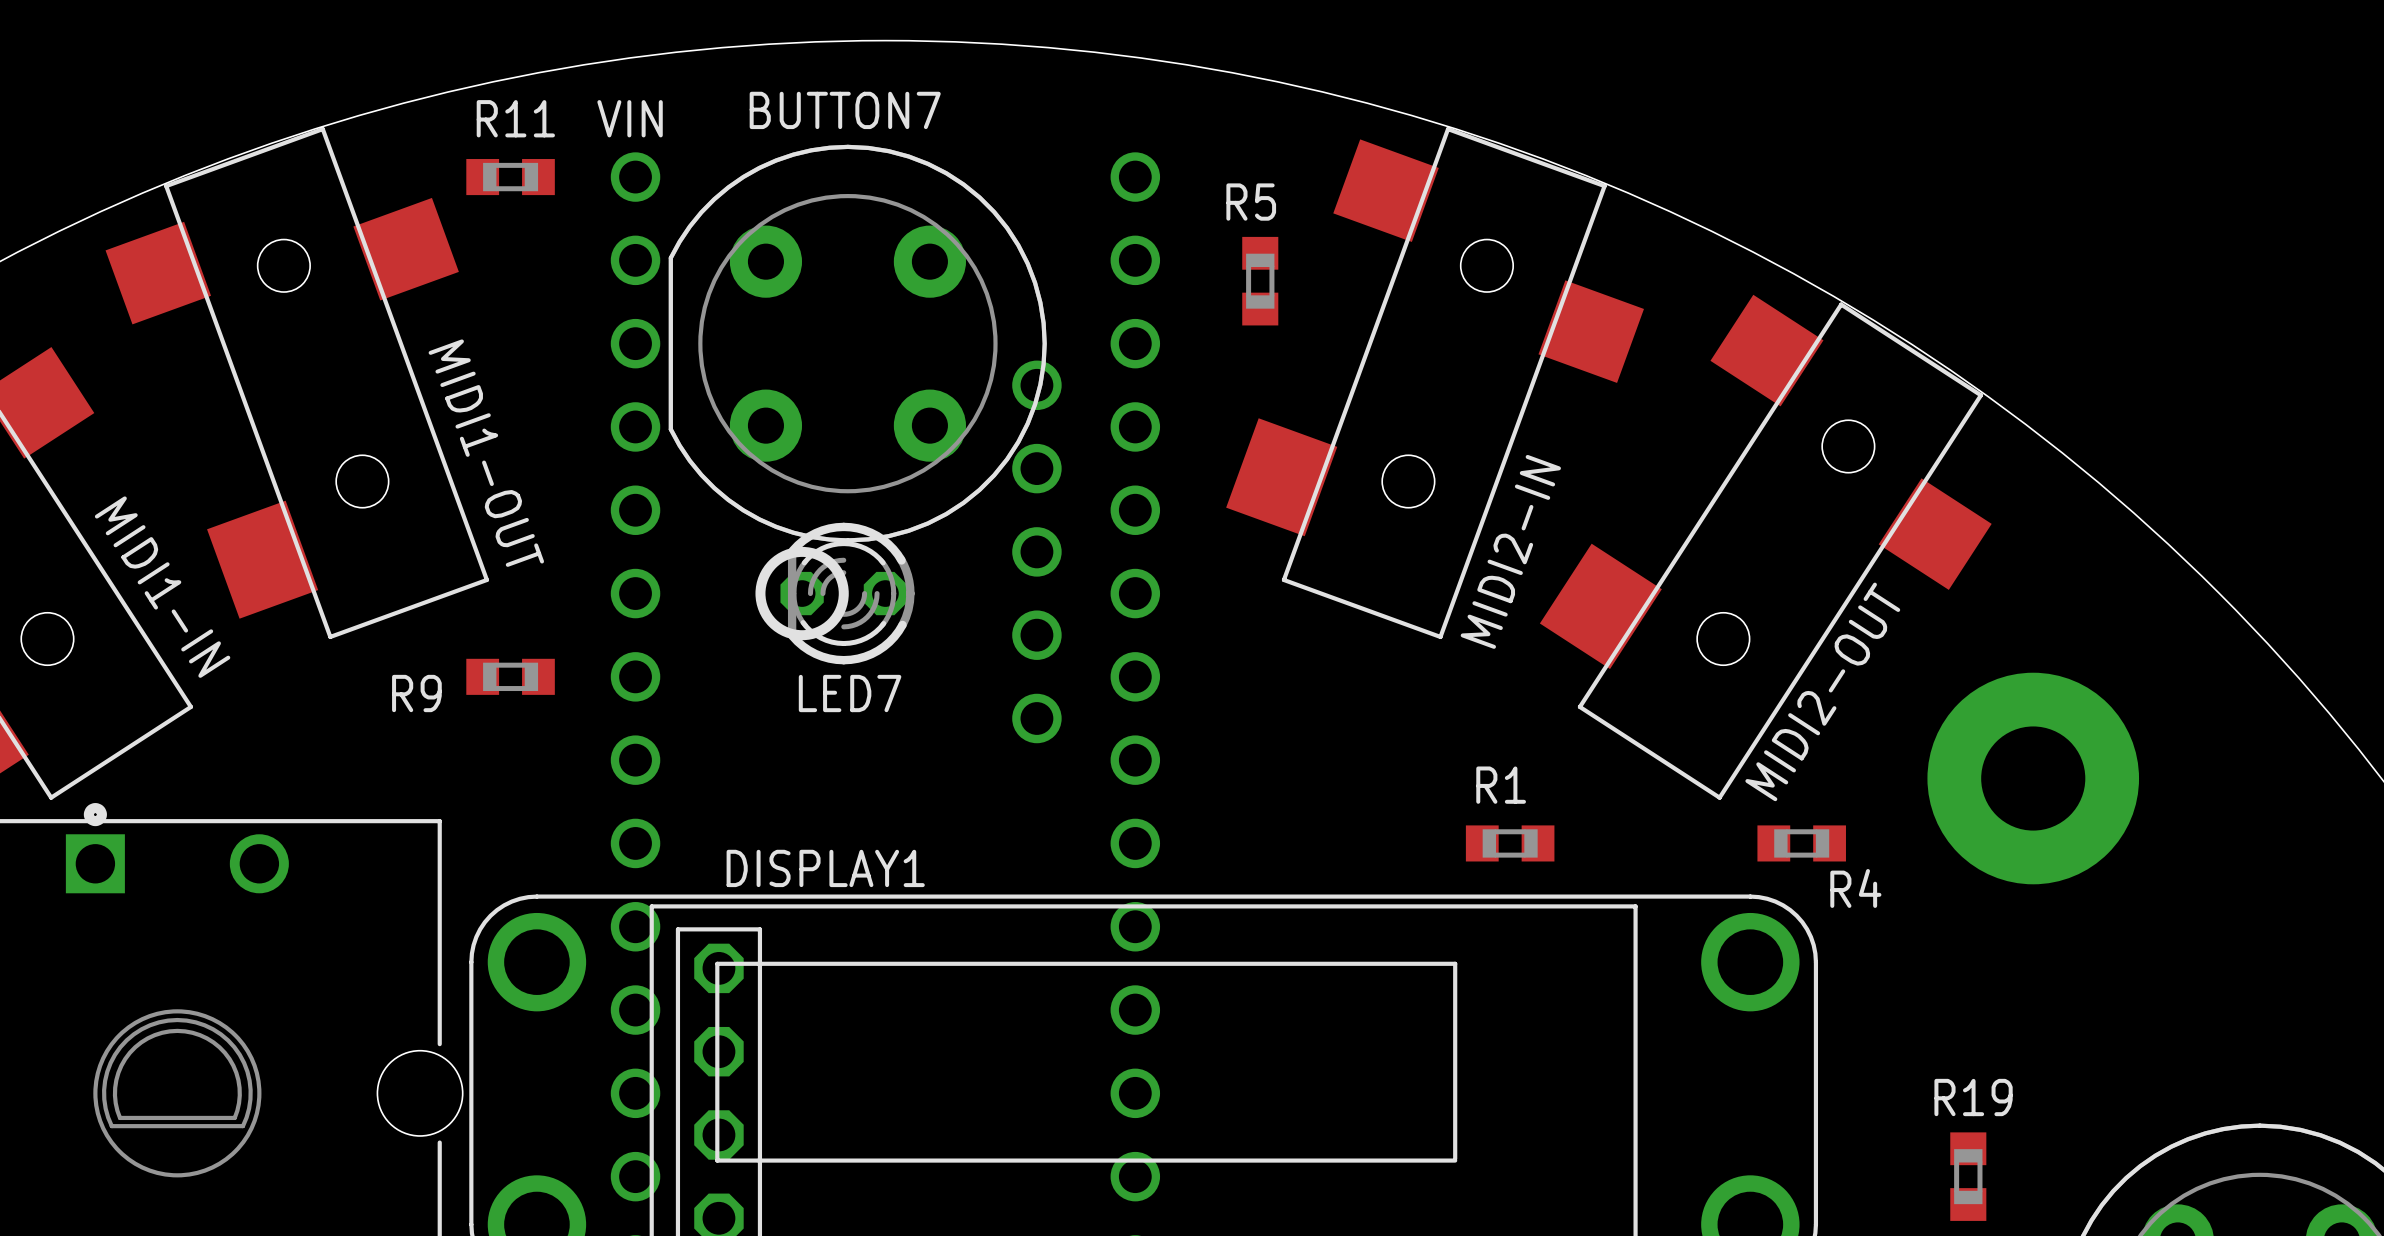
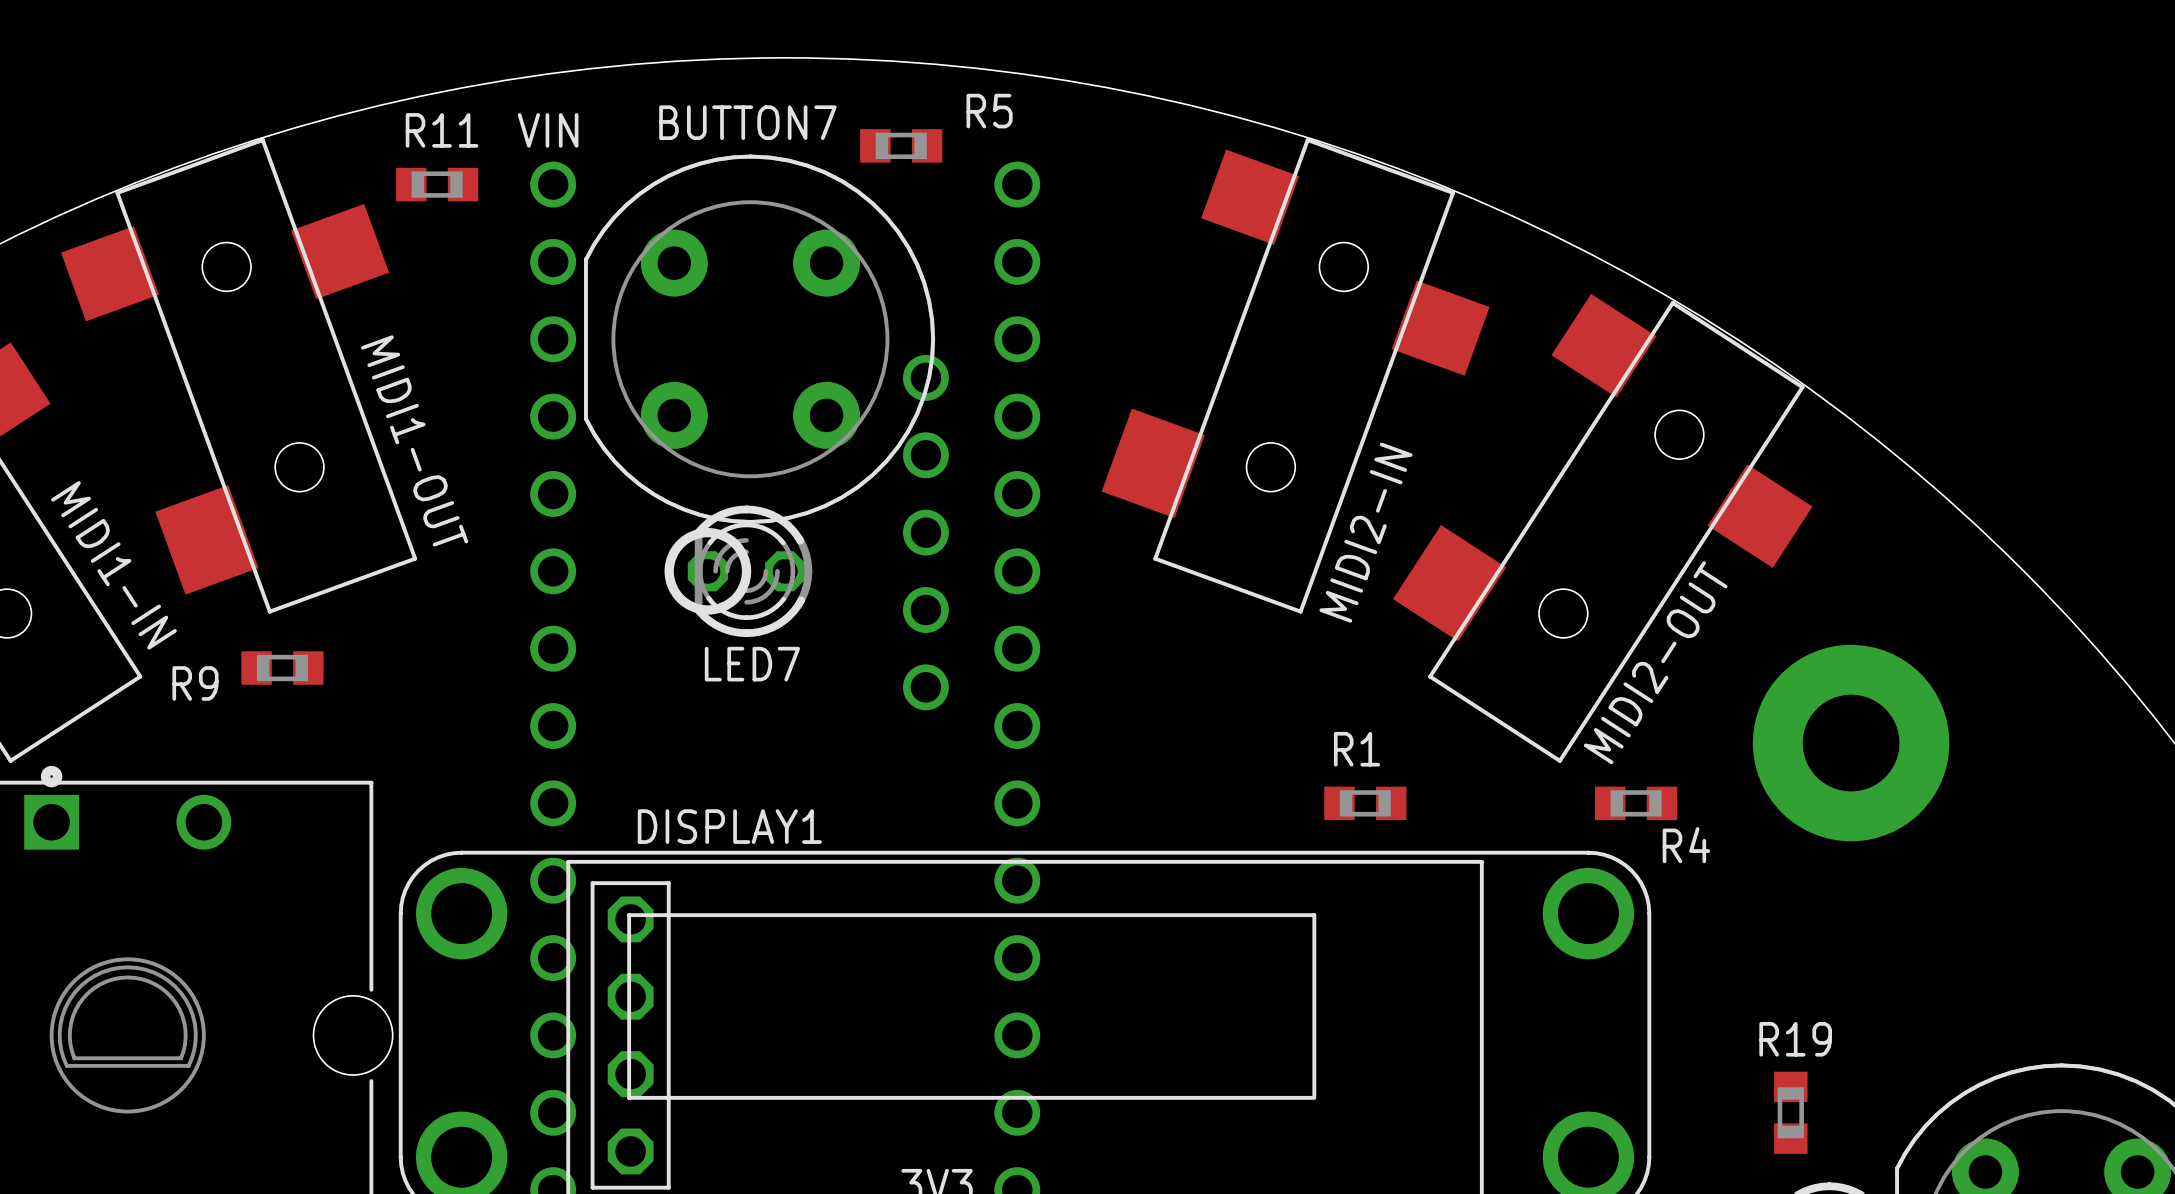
R5 rotation: 0° (1260, 281) -> 90° clockwise (901, 145)
R5 position: (1260, 281) -> (901, 145)
R9 position: (510, 676) -> (282, 668)

